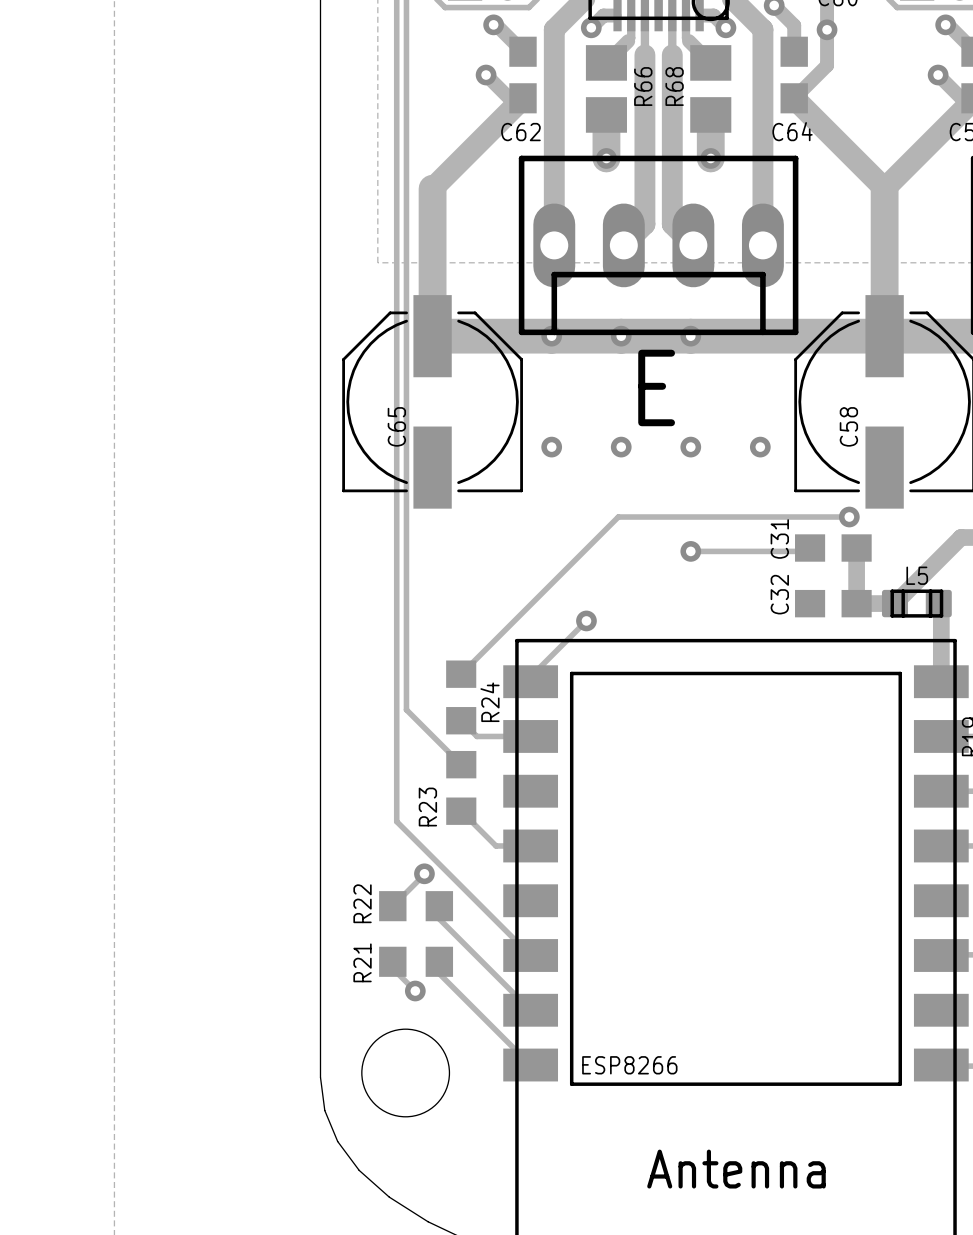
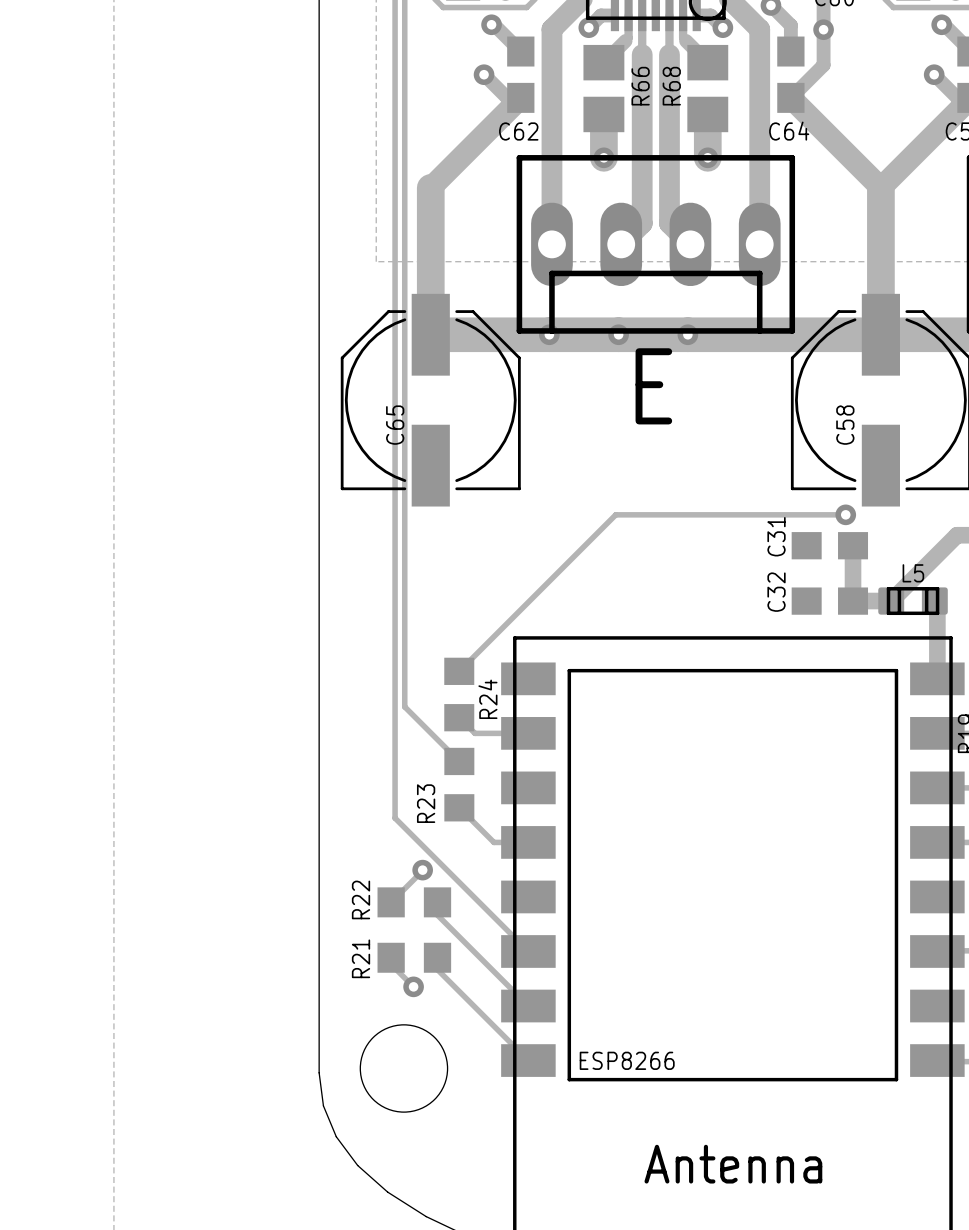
via: (551, 447) -> none
via: (621, 447) -> none
via: (690, 447) -> none
via: (760, 447) -> none
track: (810, 548) (806, 551) (690, 551) -> none
via: (690, 551) -> none
track: (586, 620) (530, 676) (530, 681) -> none
via: (586, 620) -> none

